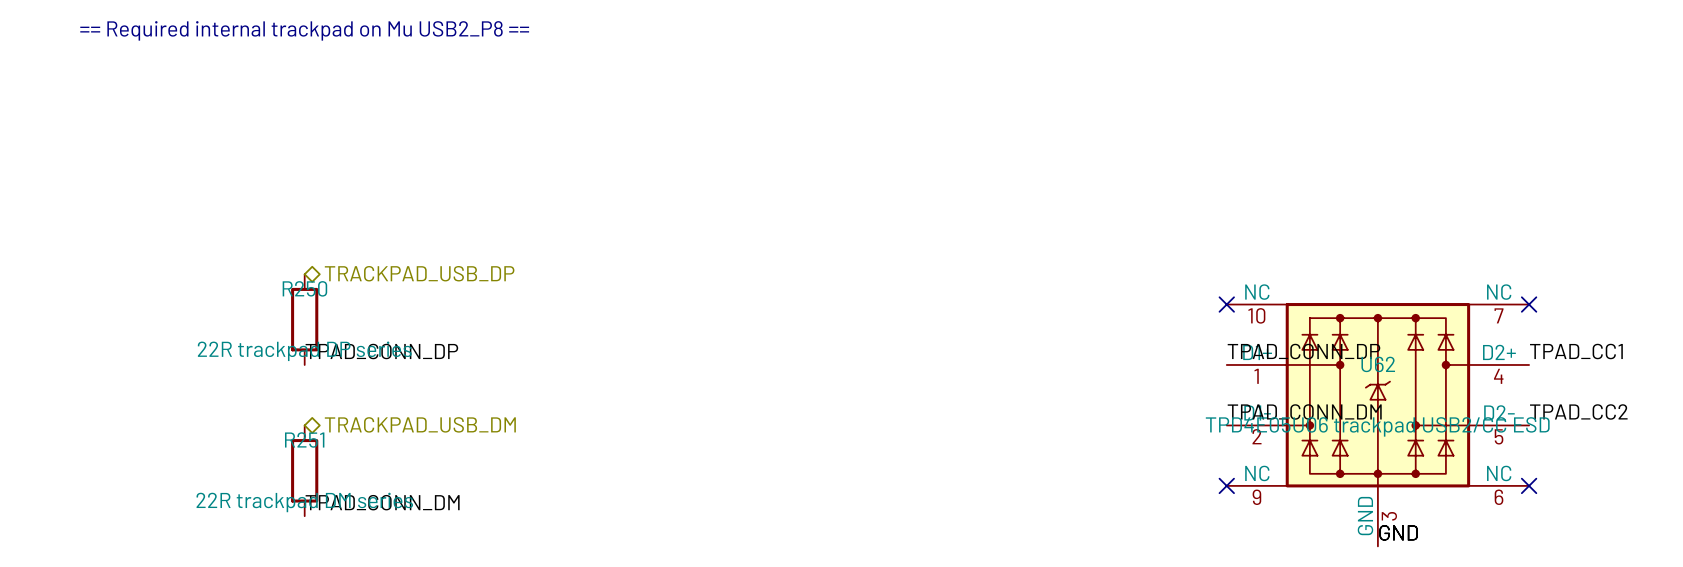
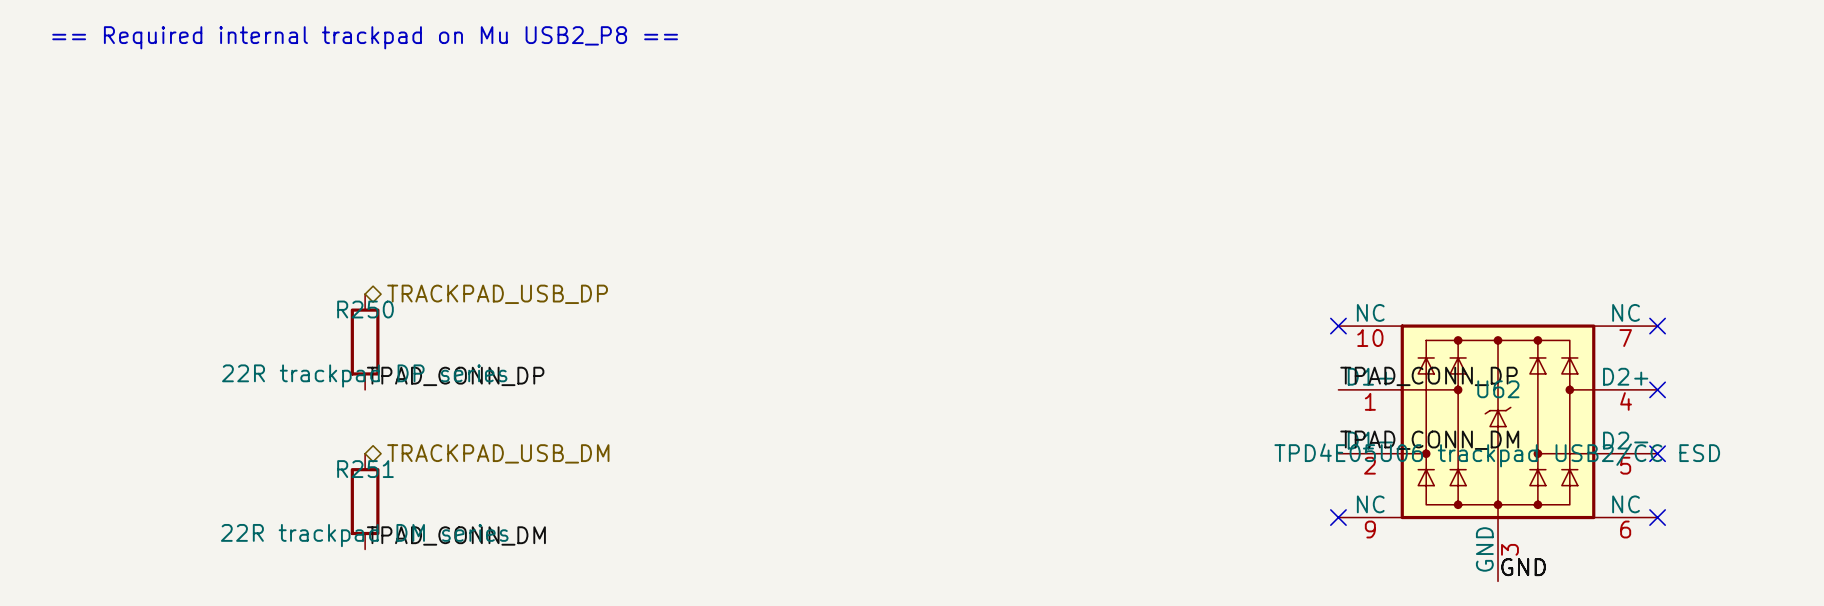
label: TPAD_CC1 (1576, 351) -> none
no-connect mark: none -> (1657, 389)
label: TPAD_CC2 (1578, 411) -> none
no-connect mark: none -> (1657, 453)

